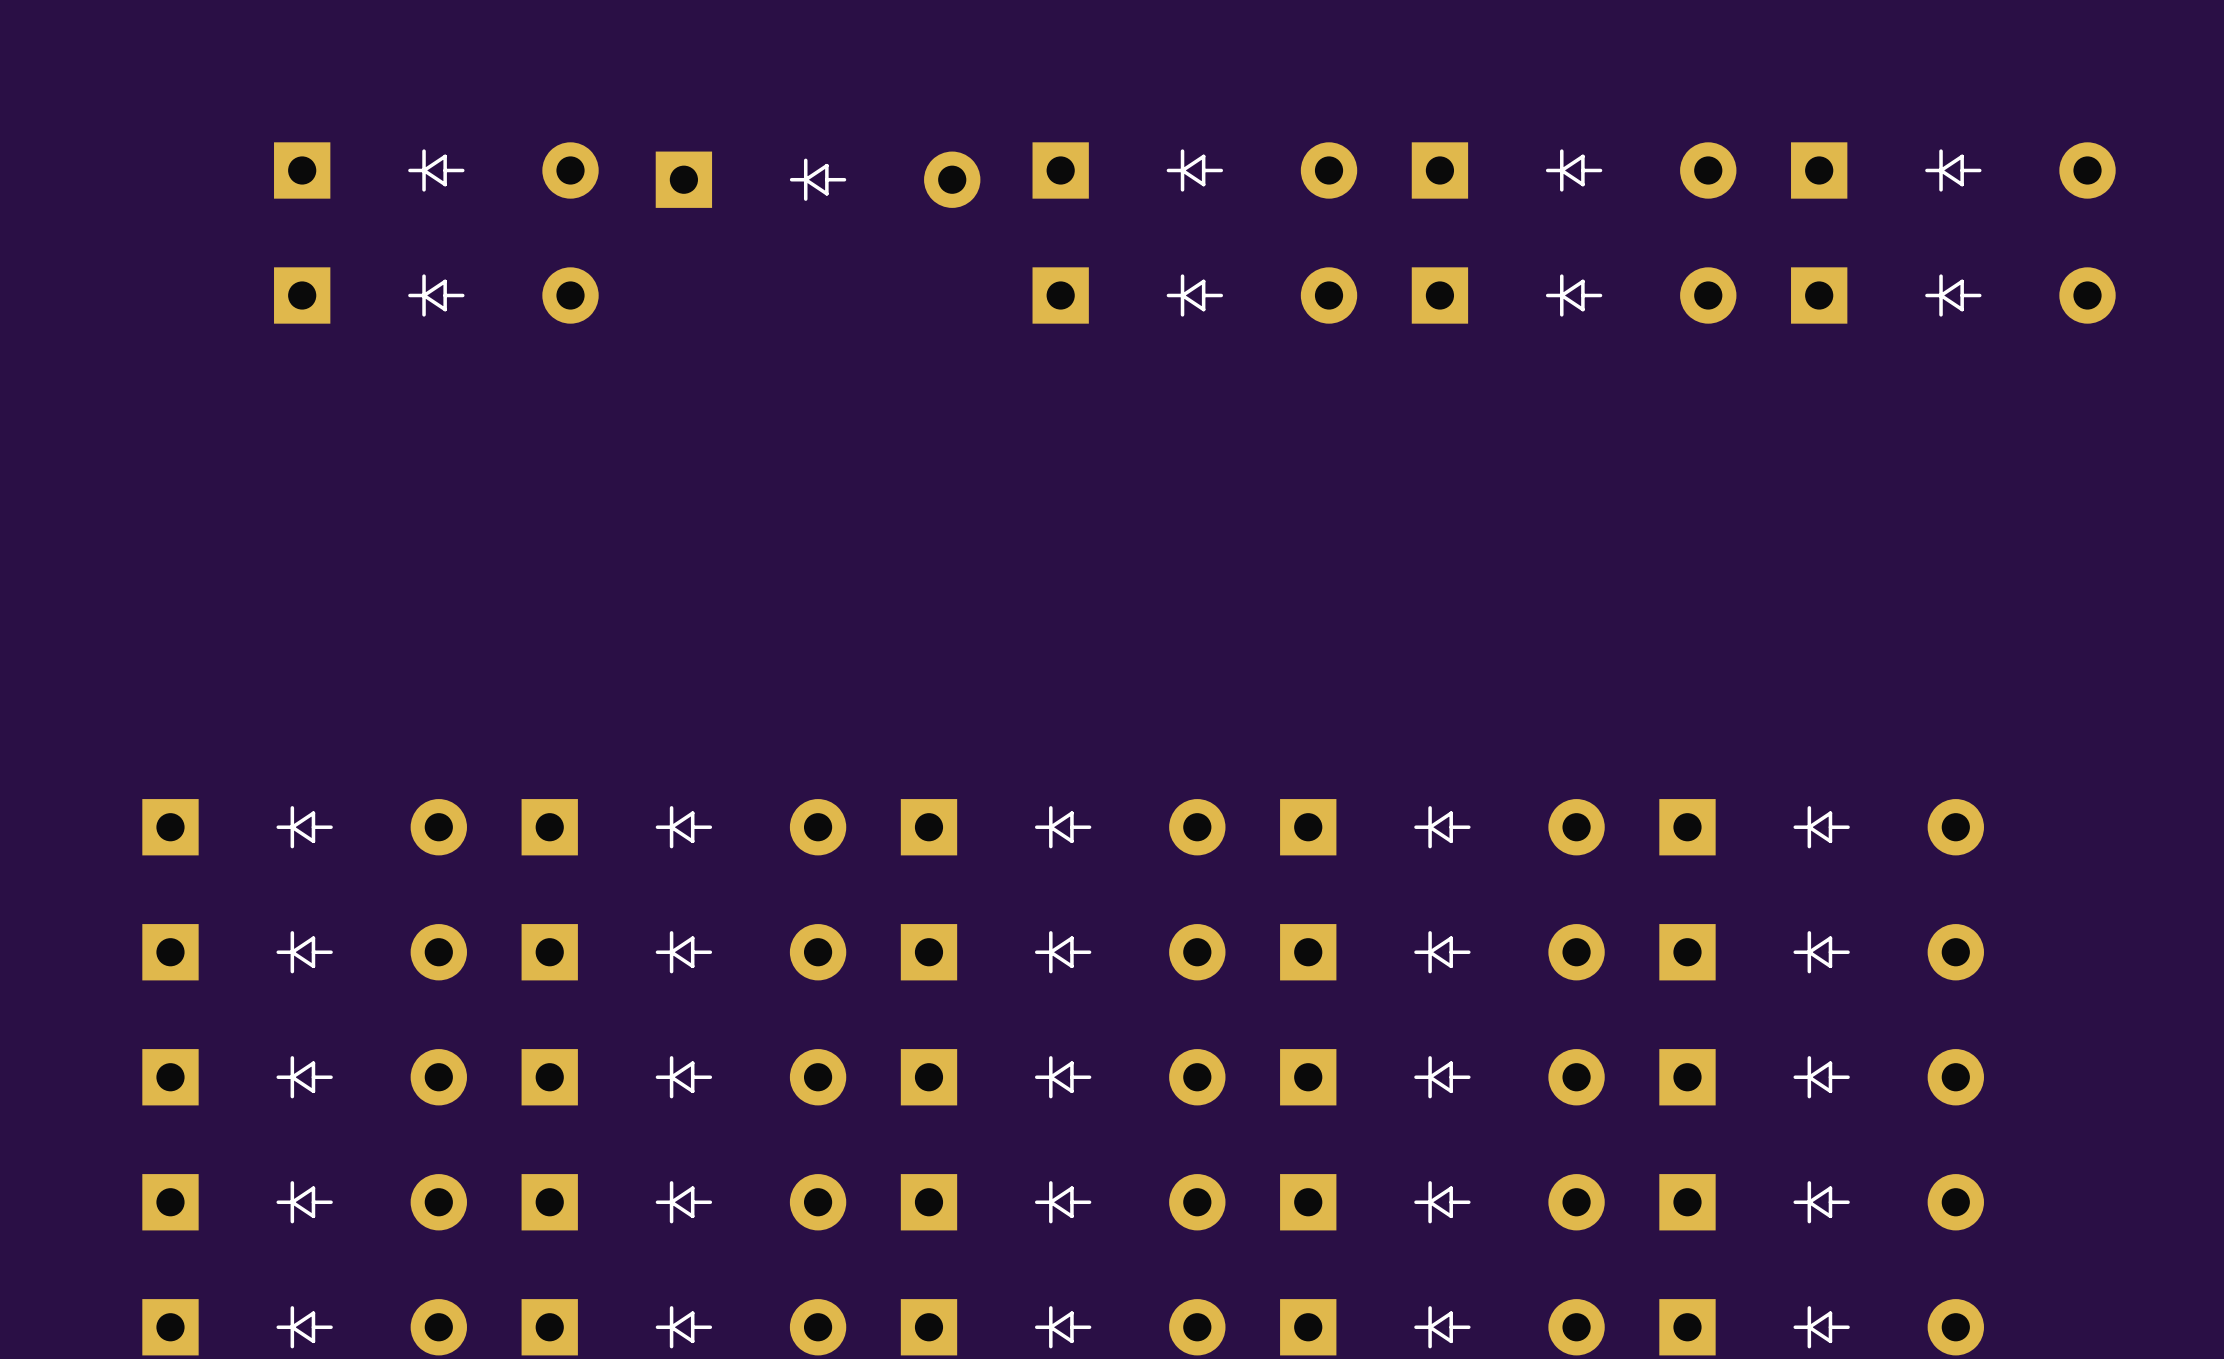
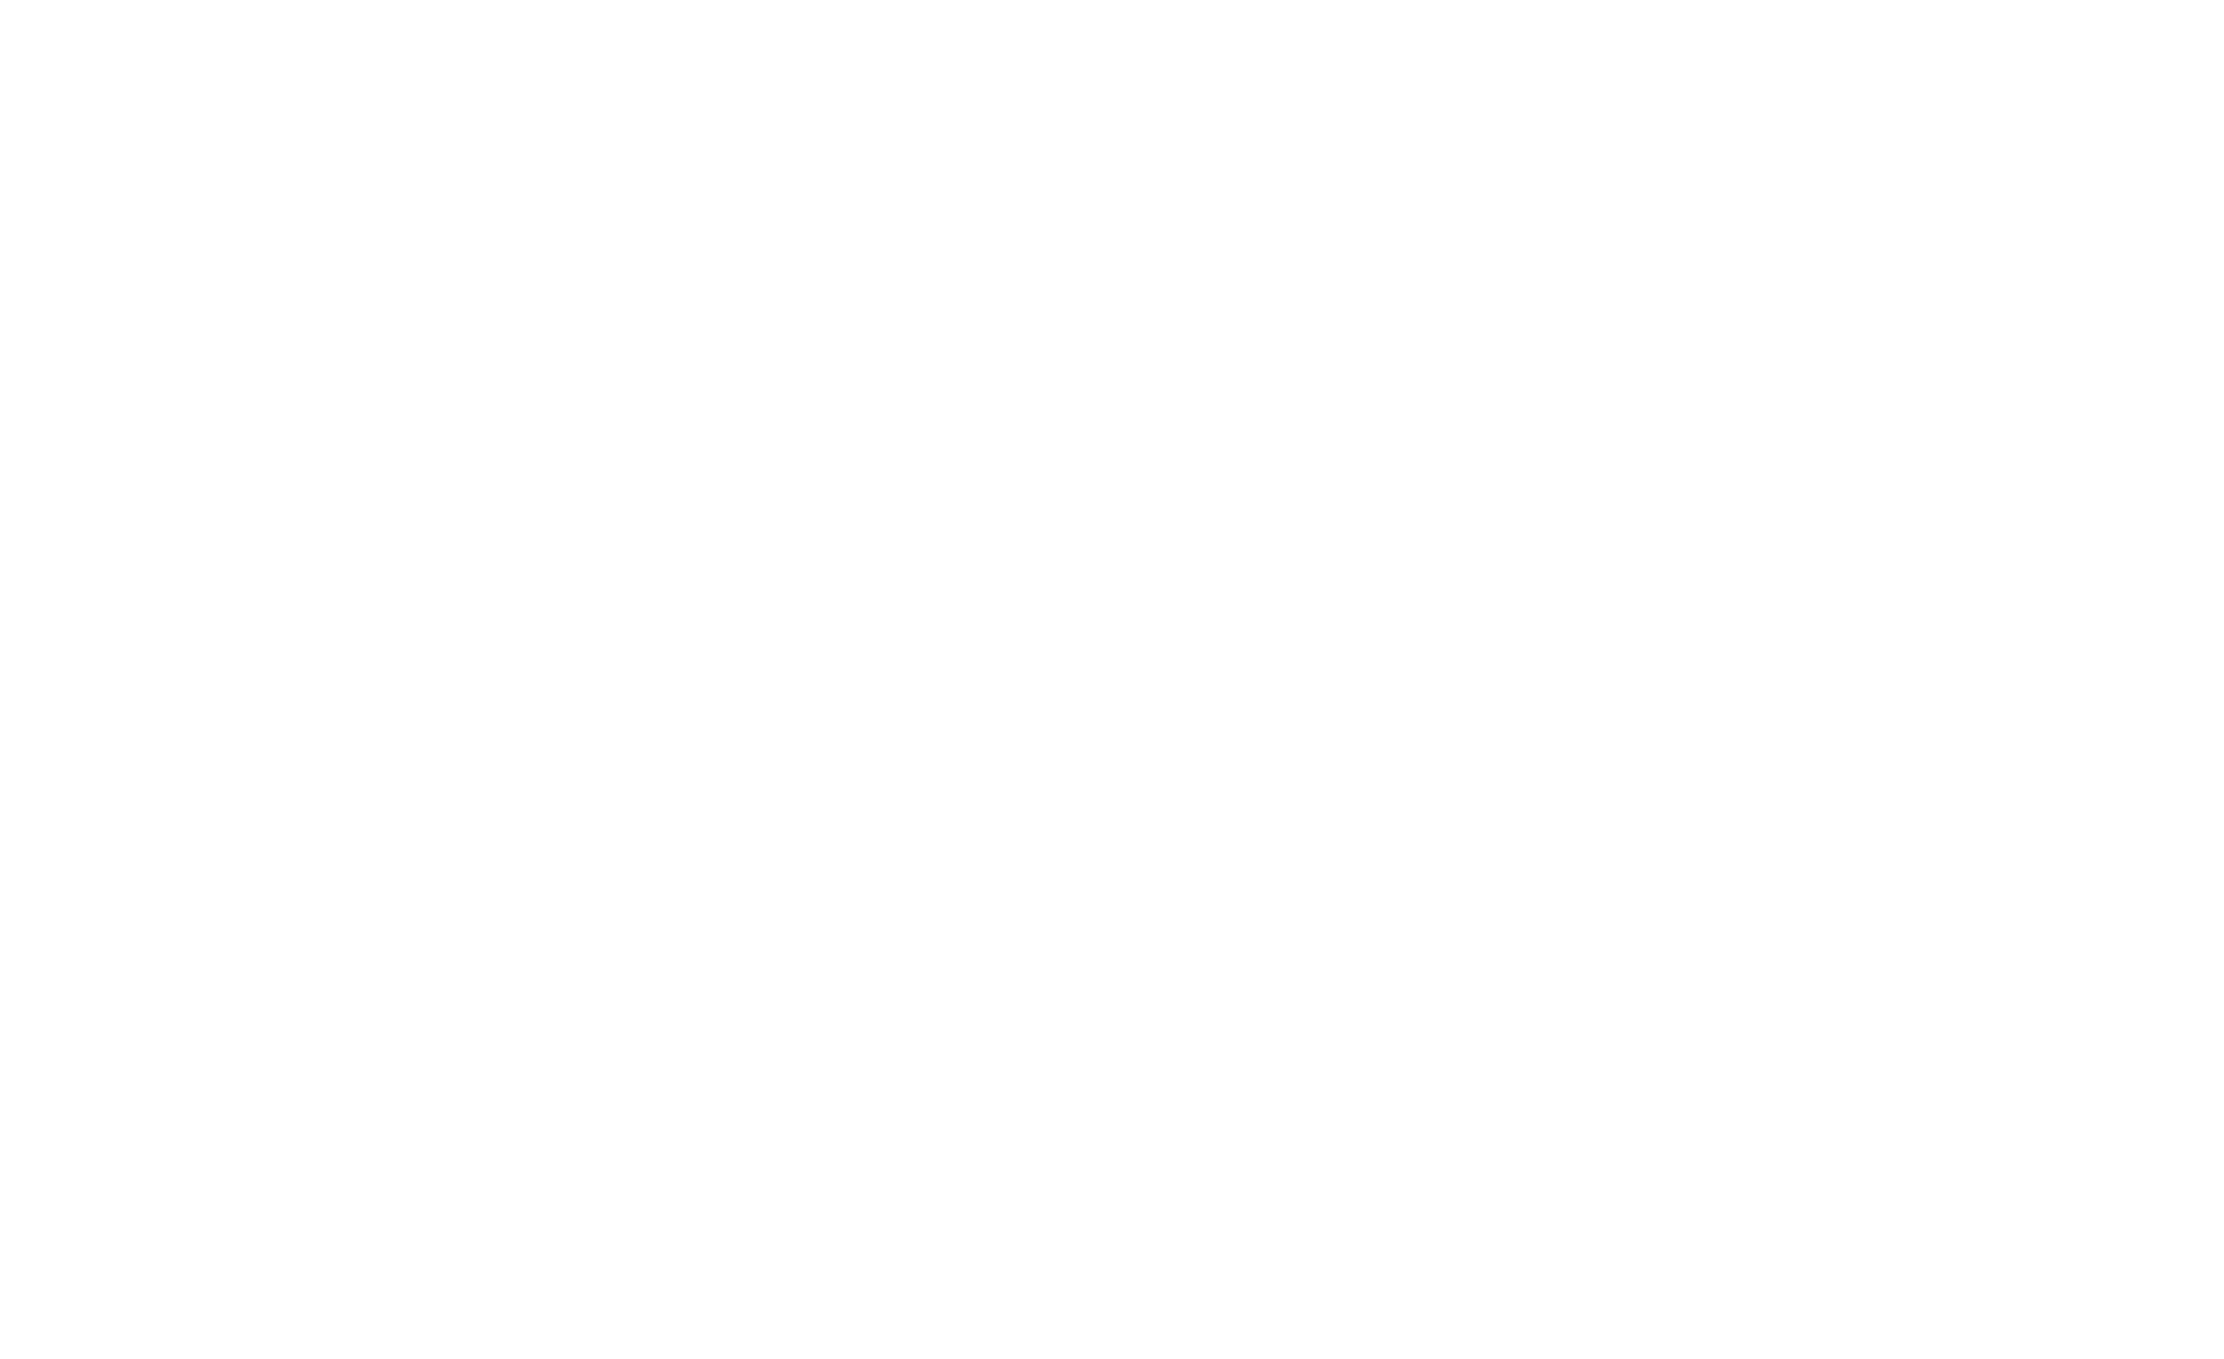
part: (436, 170) -> none
part: (1194, 170) -> none
part: (1574, 170) -> none
part: (1953, 170) -> none
part: (818, 179) -> none
part: (436, 295) -> none
part: (1194, 295) -> none
part: (1574, 295) -> none
part: (1953, 295) -> none
part: (304, 827) -> none
part: (683, 827) -> none
part: (1063, 827) -> none
part: (1442, 827) -> none
part: (1821, 827) -> none
part: (304, 952) -> none
part: (683, 952) -> none
part: (1063, 952) -> none
part: (1442, 952) -> none
part: (1821, 952) -> none
part: (304, 1077) -> none
part: (683, 1077) -> none
part: (1063, 1077) -> none
part: (1442, 1077) -> none
part: (1821, 1077) -> none
part: (304, 1202) -> none
part: (683, 1202) -> none
part: (1063, 1202) -> none
part: (1442, 1202) -> none
part: (1821, 1202) -> none
part: (304, 1327) -> none
part: (683, 1327) -> none
part: (1063, 1327) -> none
part: (1442, 1327) -> none
part: (1821, 1327) -> none

